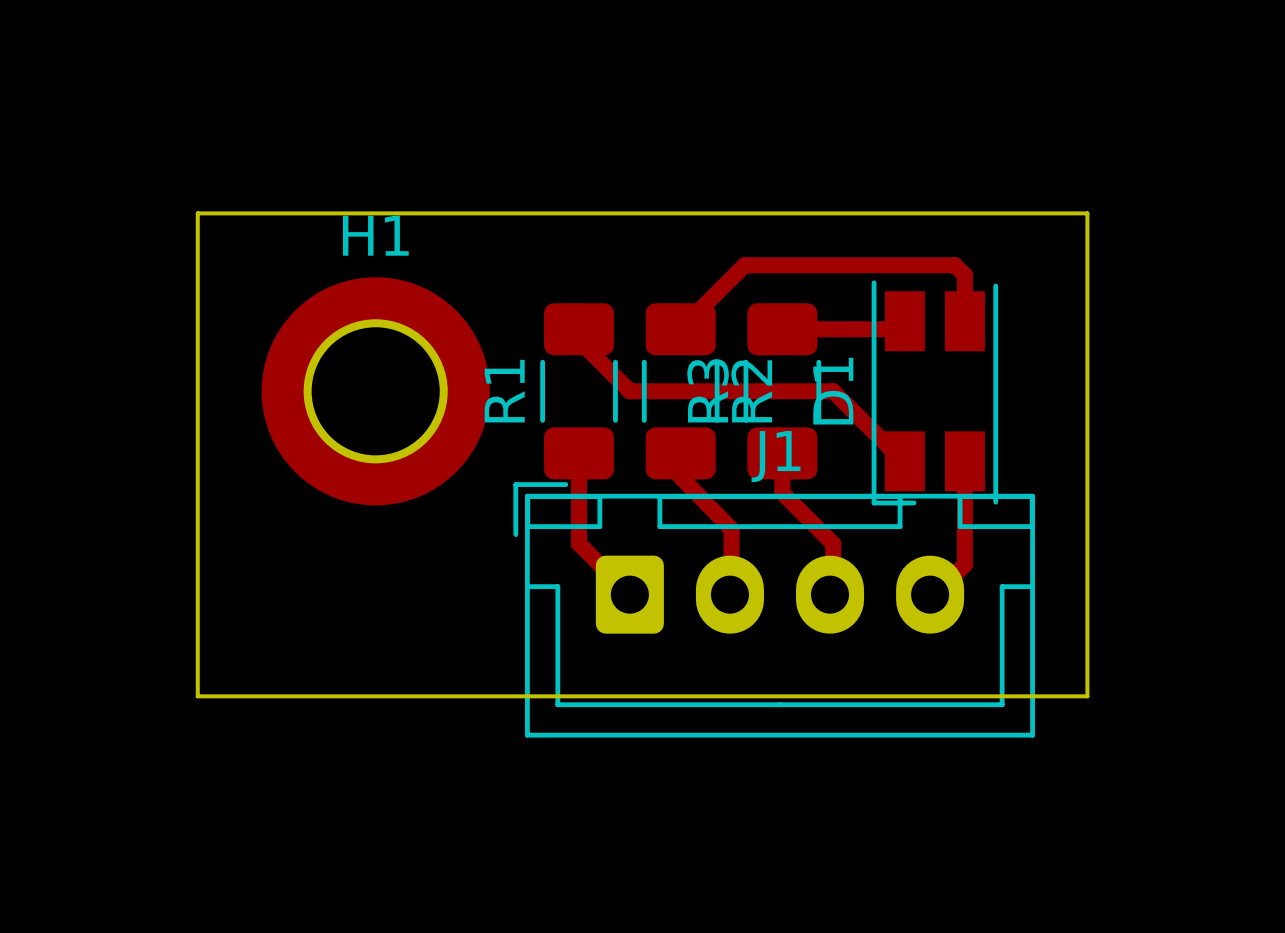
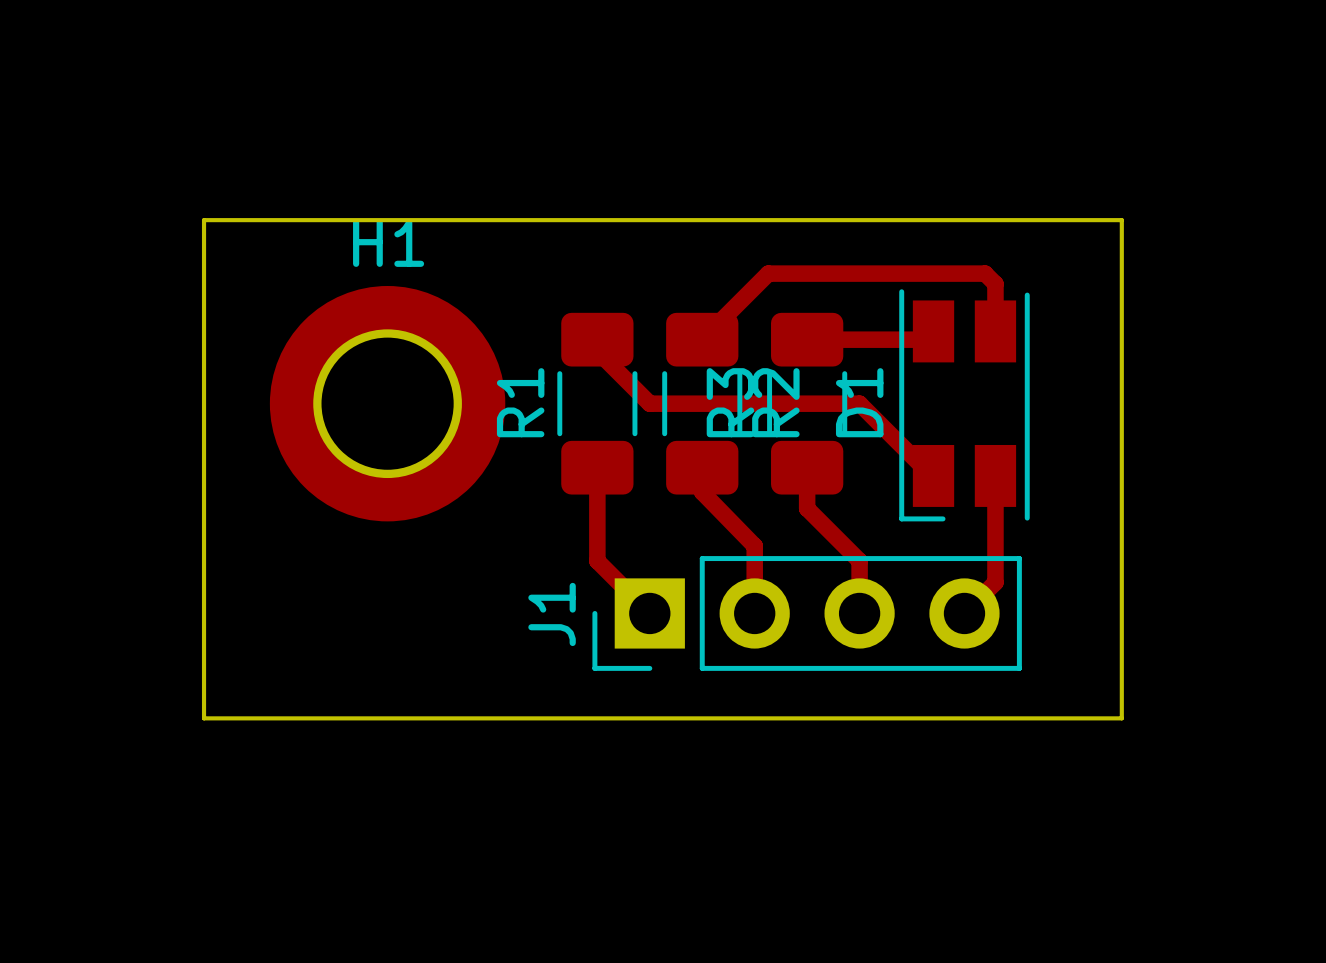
J1 name position: J1 (776, 456) -> J1 (552, 614)
J1 footprint: [513, 482, 1035, 738] -> [592, 556, 1022, 671]

